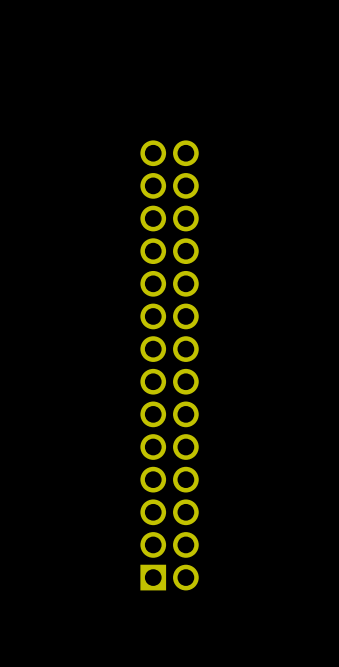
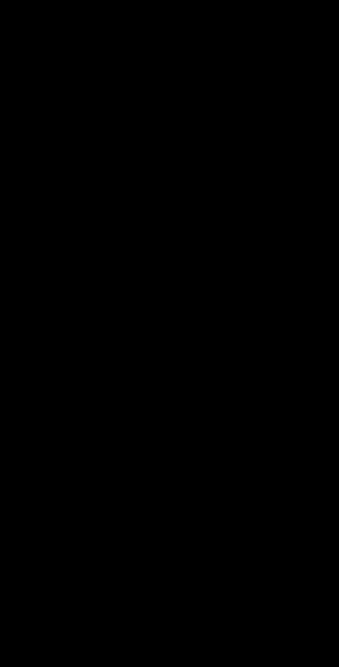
part: (169, 365) -> none

